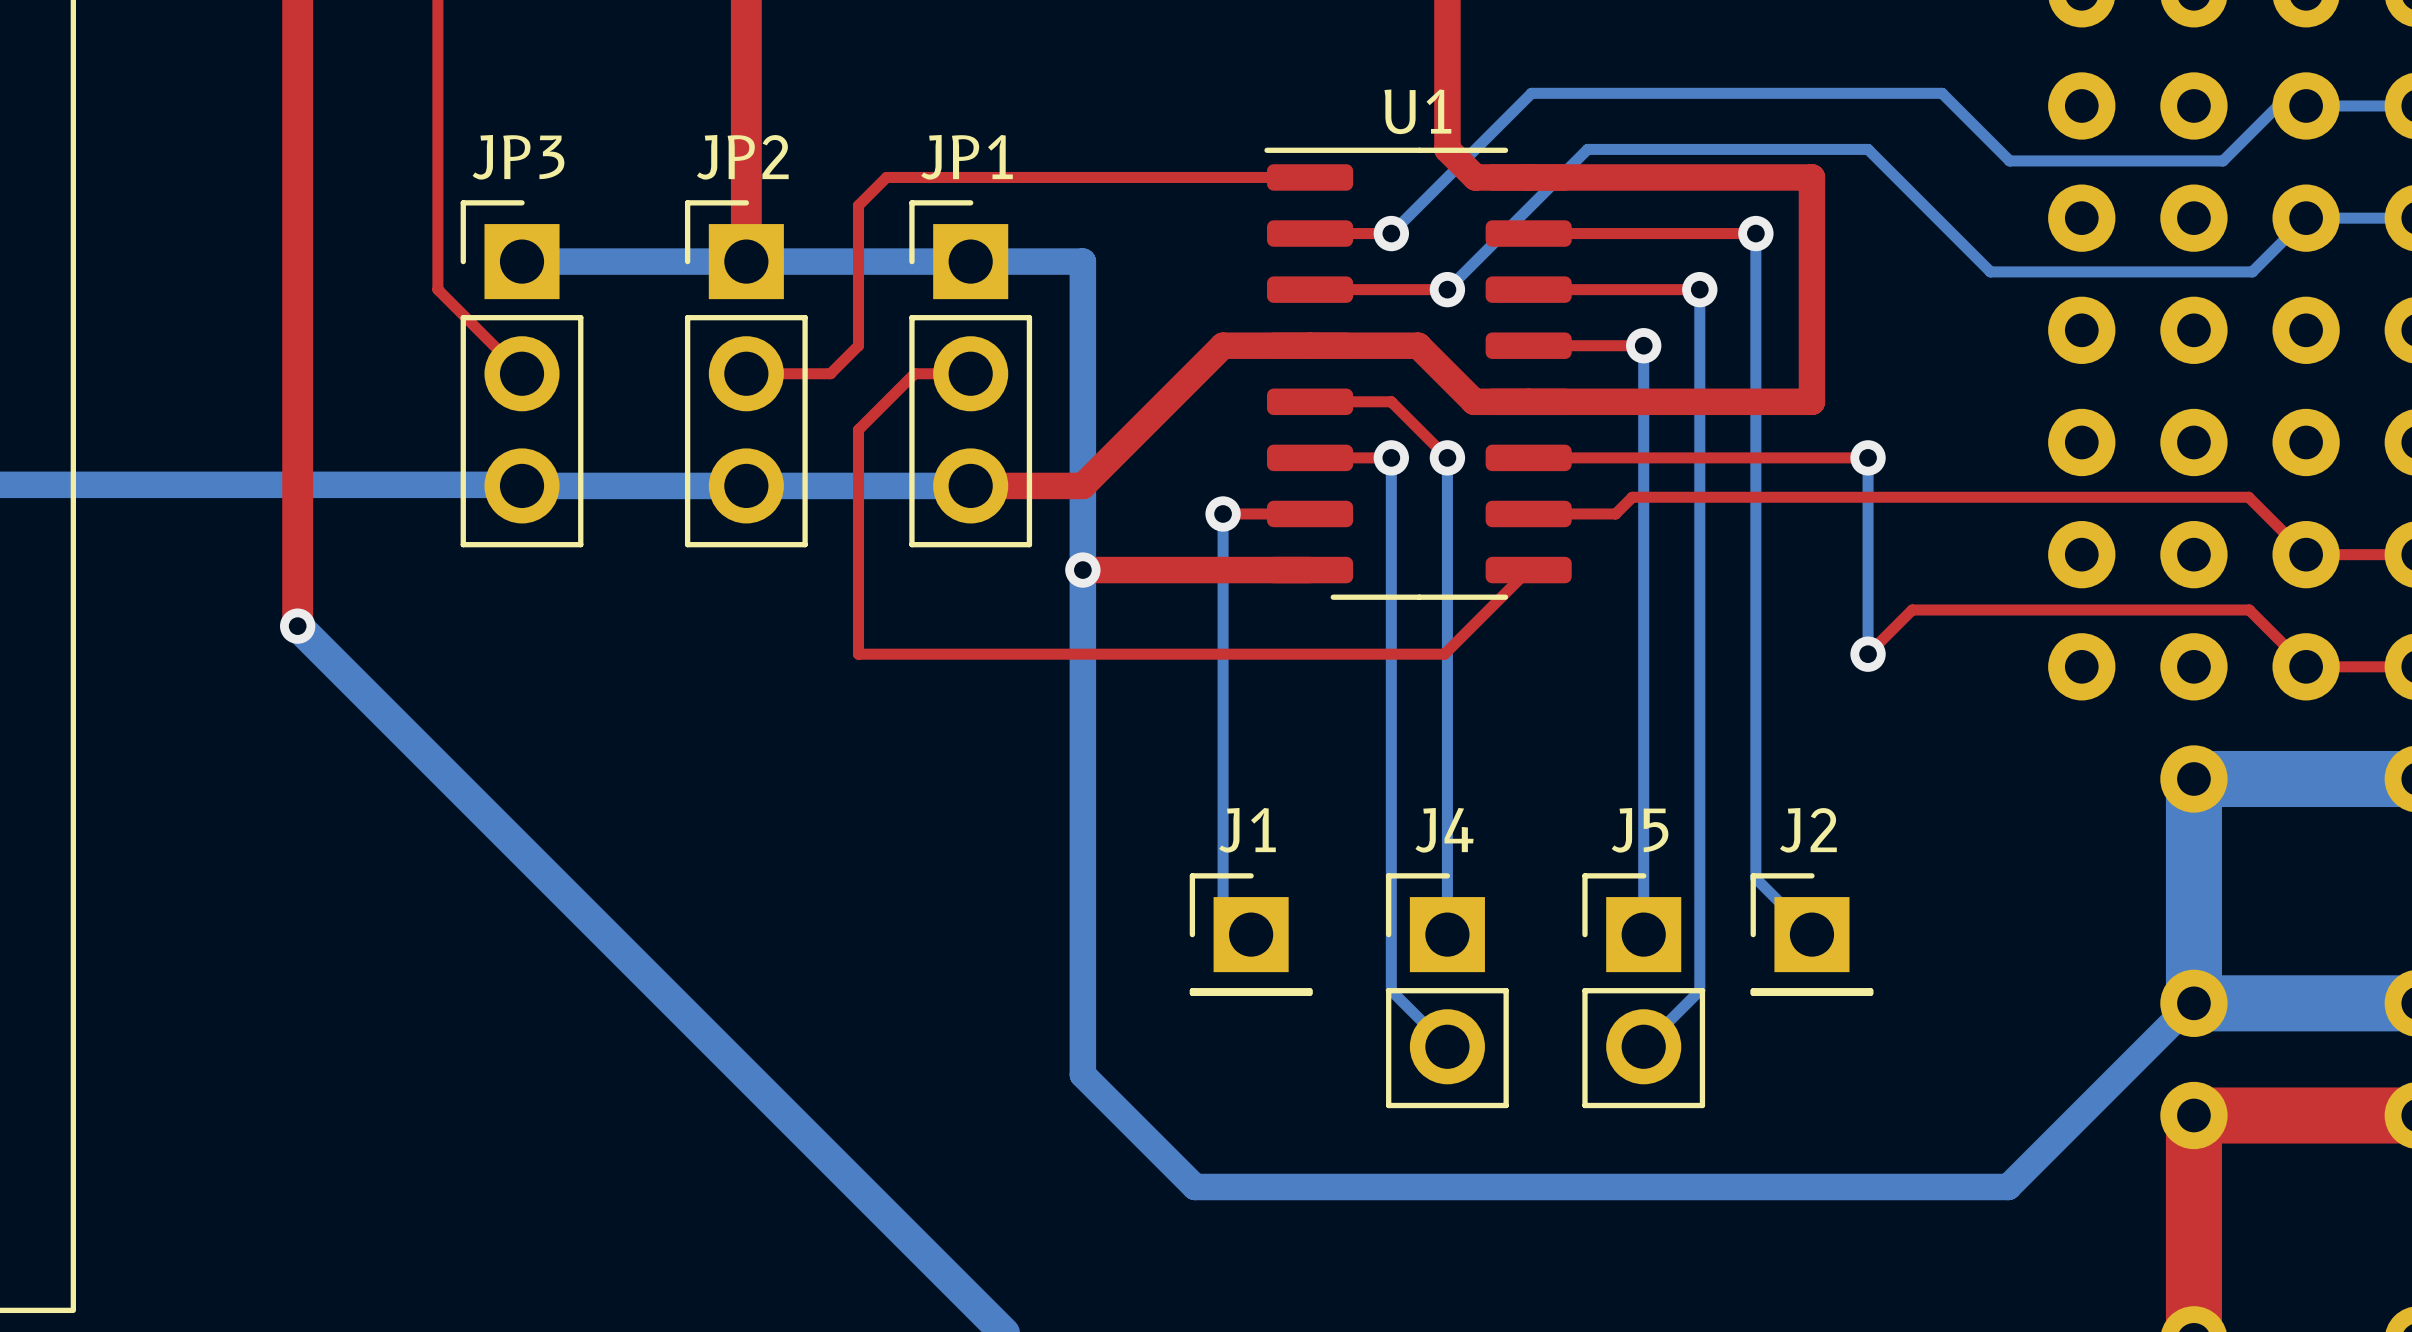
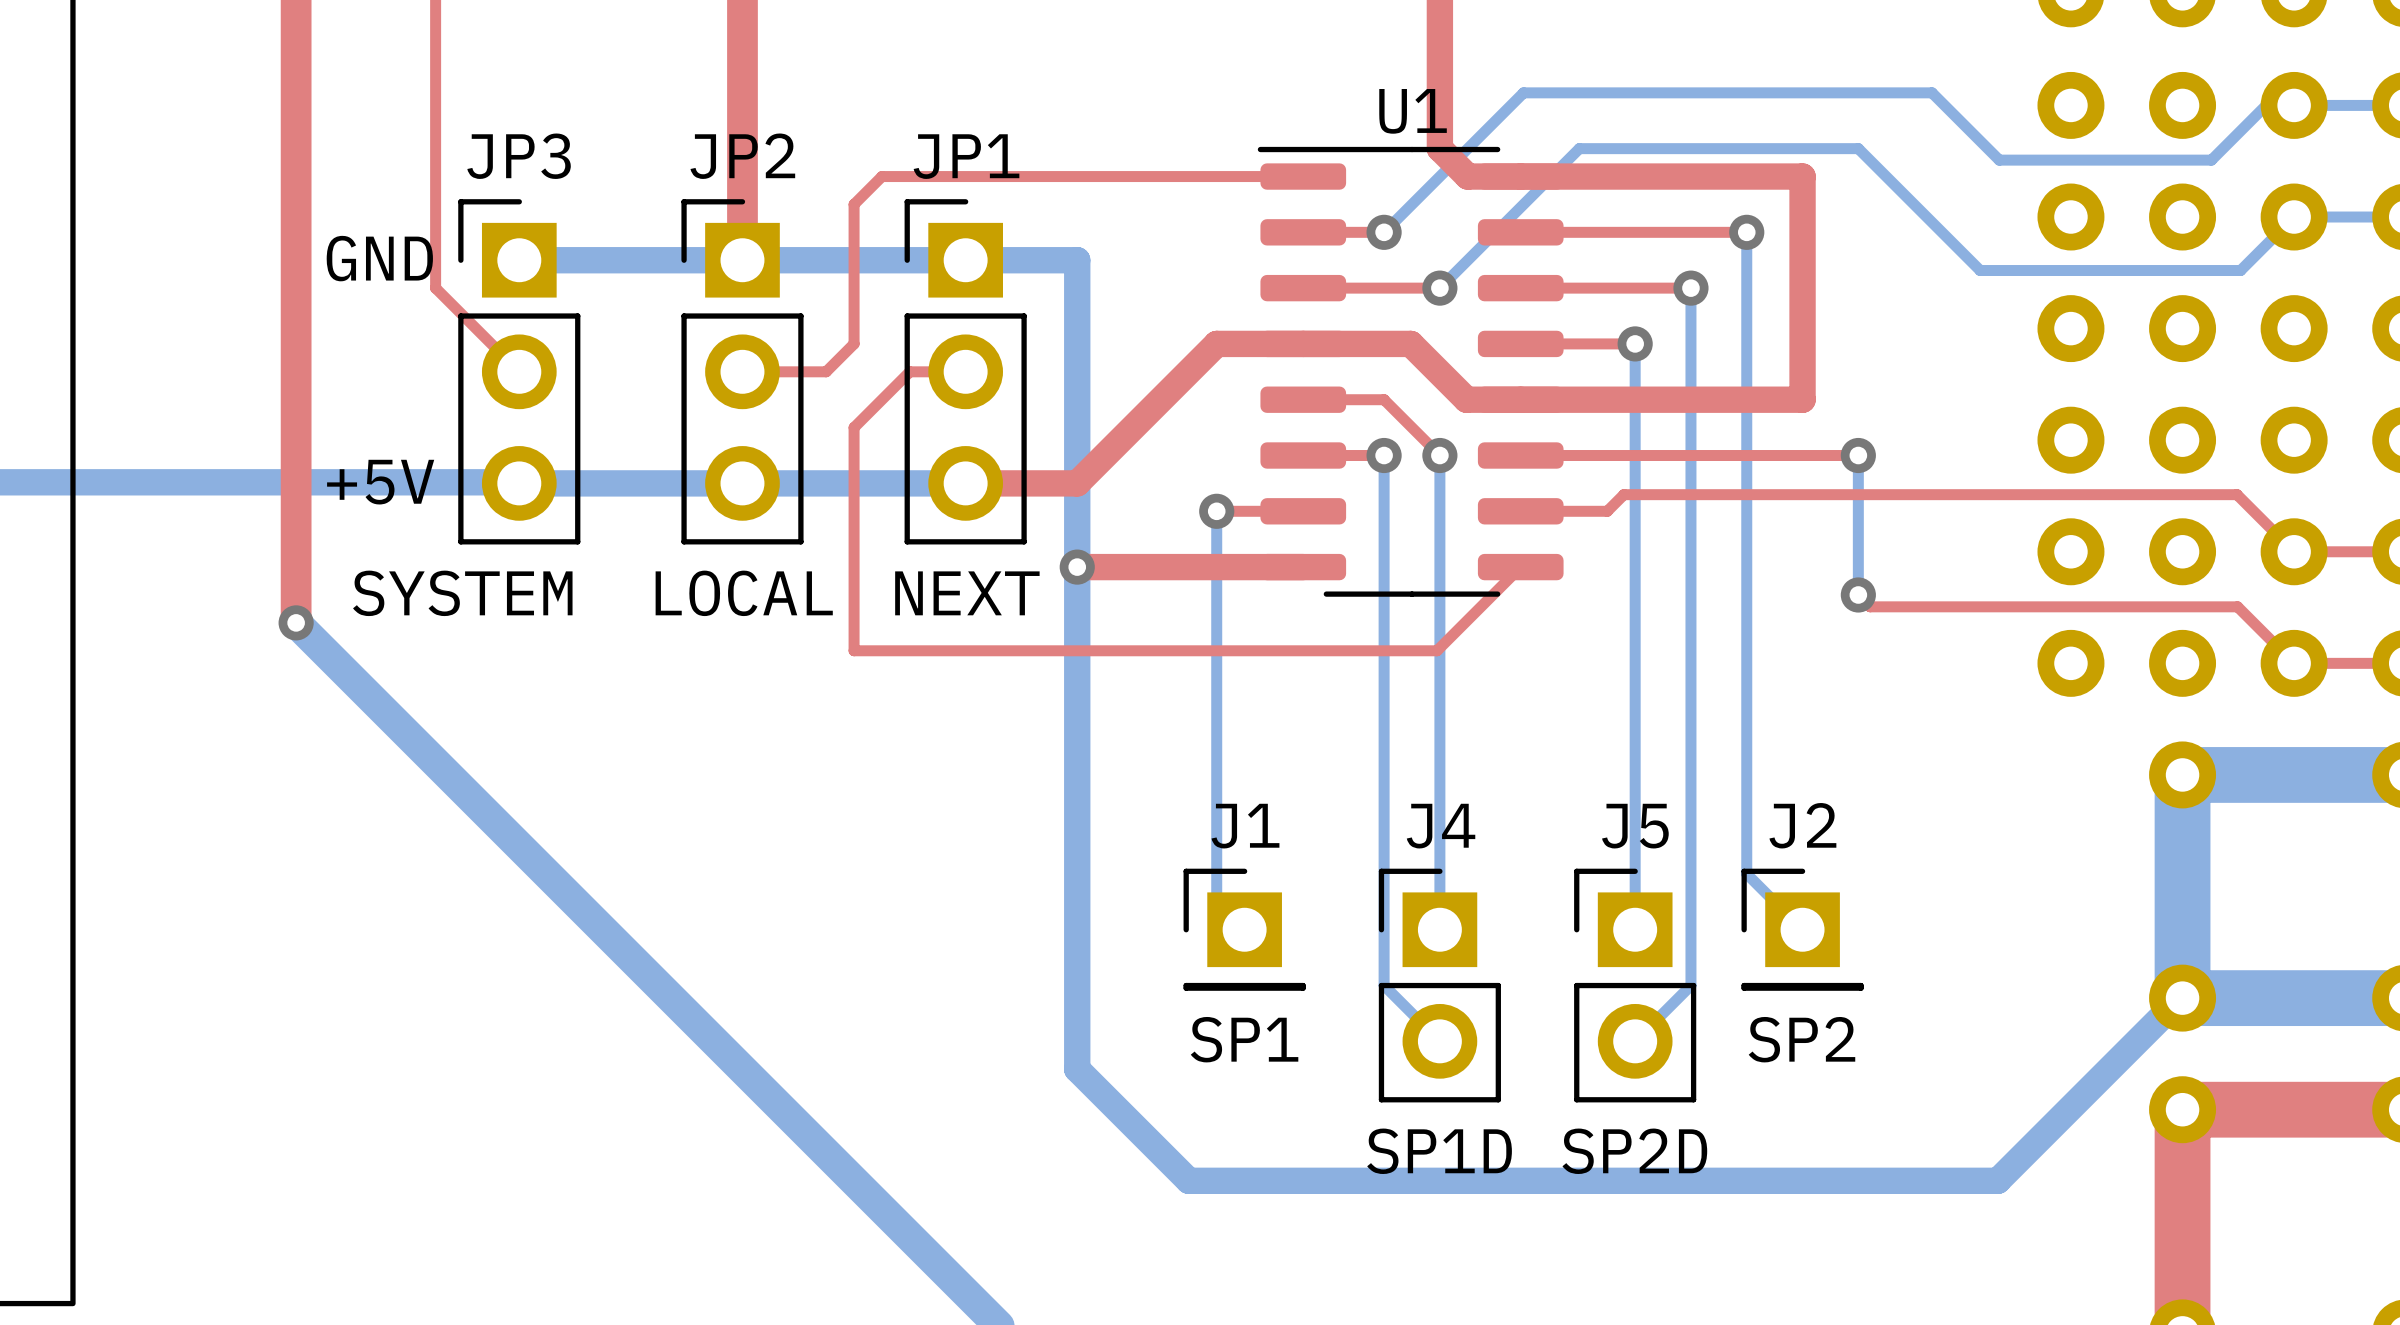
text: none -> GND (379, 258)
text: none -> +5V (380, 482)
text: none -> SYSTEM (462, 593)
text: none -> LOCAL (744, 593)
text: none -> NEXT (967, 593)
bottom track: (1868, 598) (1868, 654) -> none
top track: (1912, 610) (1868, 654) -> (1902, 606) (1870, 606) (1858, 594)
via position: (1868, 654) -> (1858, 594)
text: none -> SP1 (1244, 1039)
text: none -> SP2 (1801, 1039)
text: none -> SP1D (1439, 1151)
text: none -> SP2D (1634, 1151)

